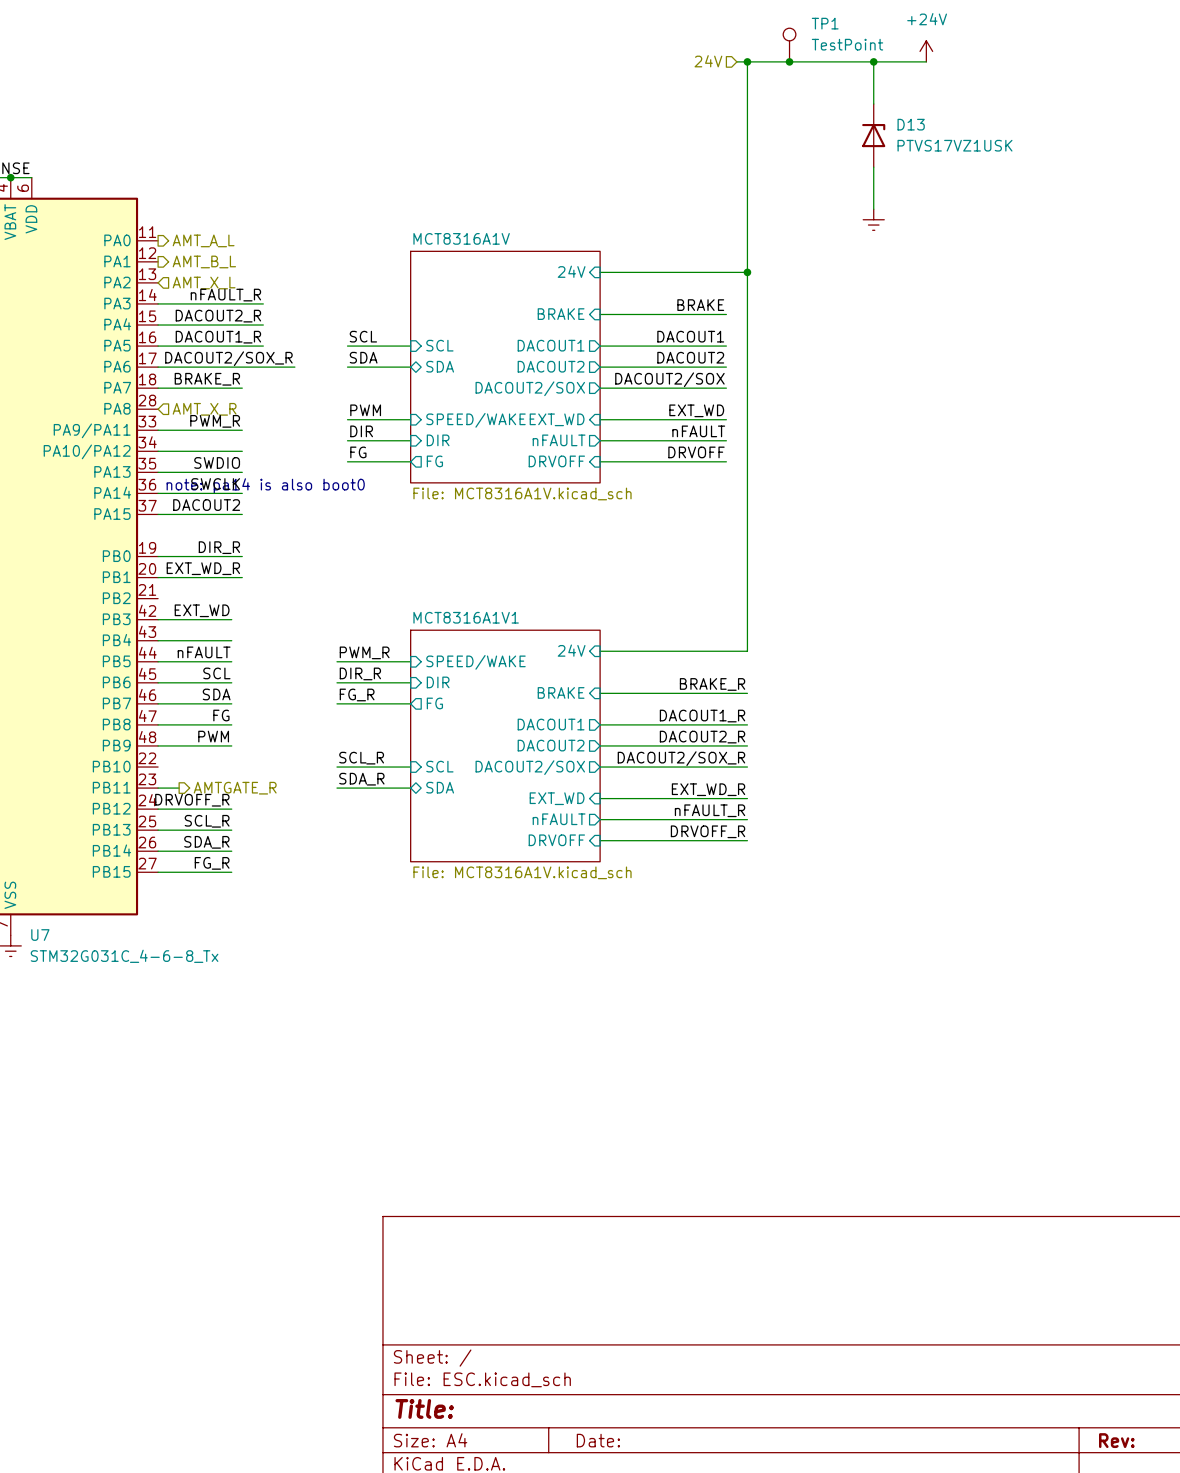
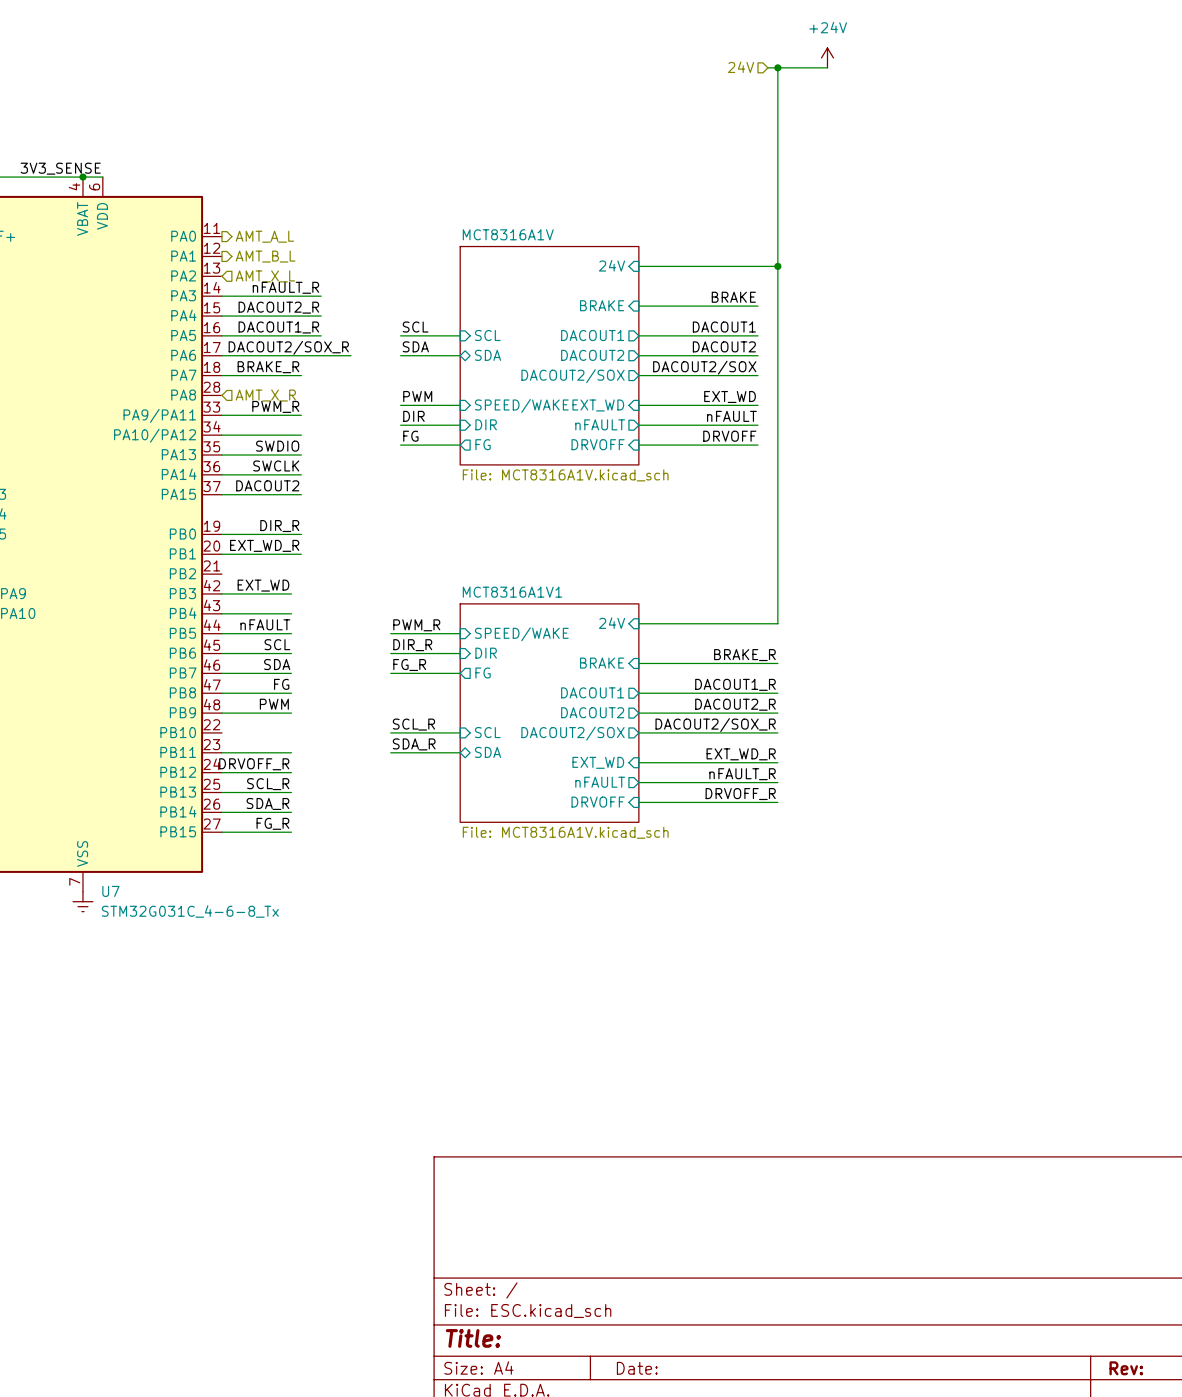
TP1: TestPoint (789, 45) -> none
power symbol position: +24V (926, 51) -> +24V (827, 57)
junction: (789, 61) -> none
wire: (800, 61) (926, 61) -> none
wire: (873, 61) (873, 104) -> none
junction: (873, 61) -> none
D13: PTVS17VZ1USK (873, 135) -> none
wire: (873, 167) (873, 209) -> none
power symbol: (873, 219) -> none
text: note: pa14 is also boot0 (265, 486) -> none
wire: none -> (241, 752) (291, 752)
hierarchical label: AMTGATE_R (235, 788) -> none

